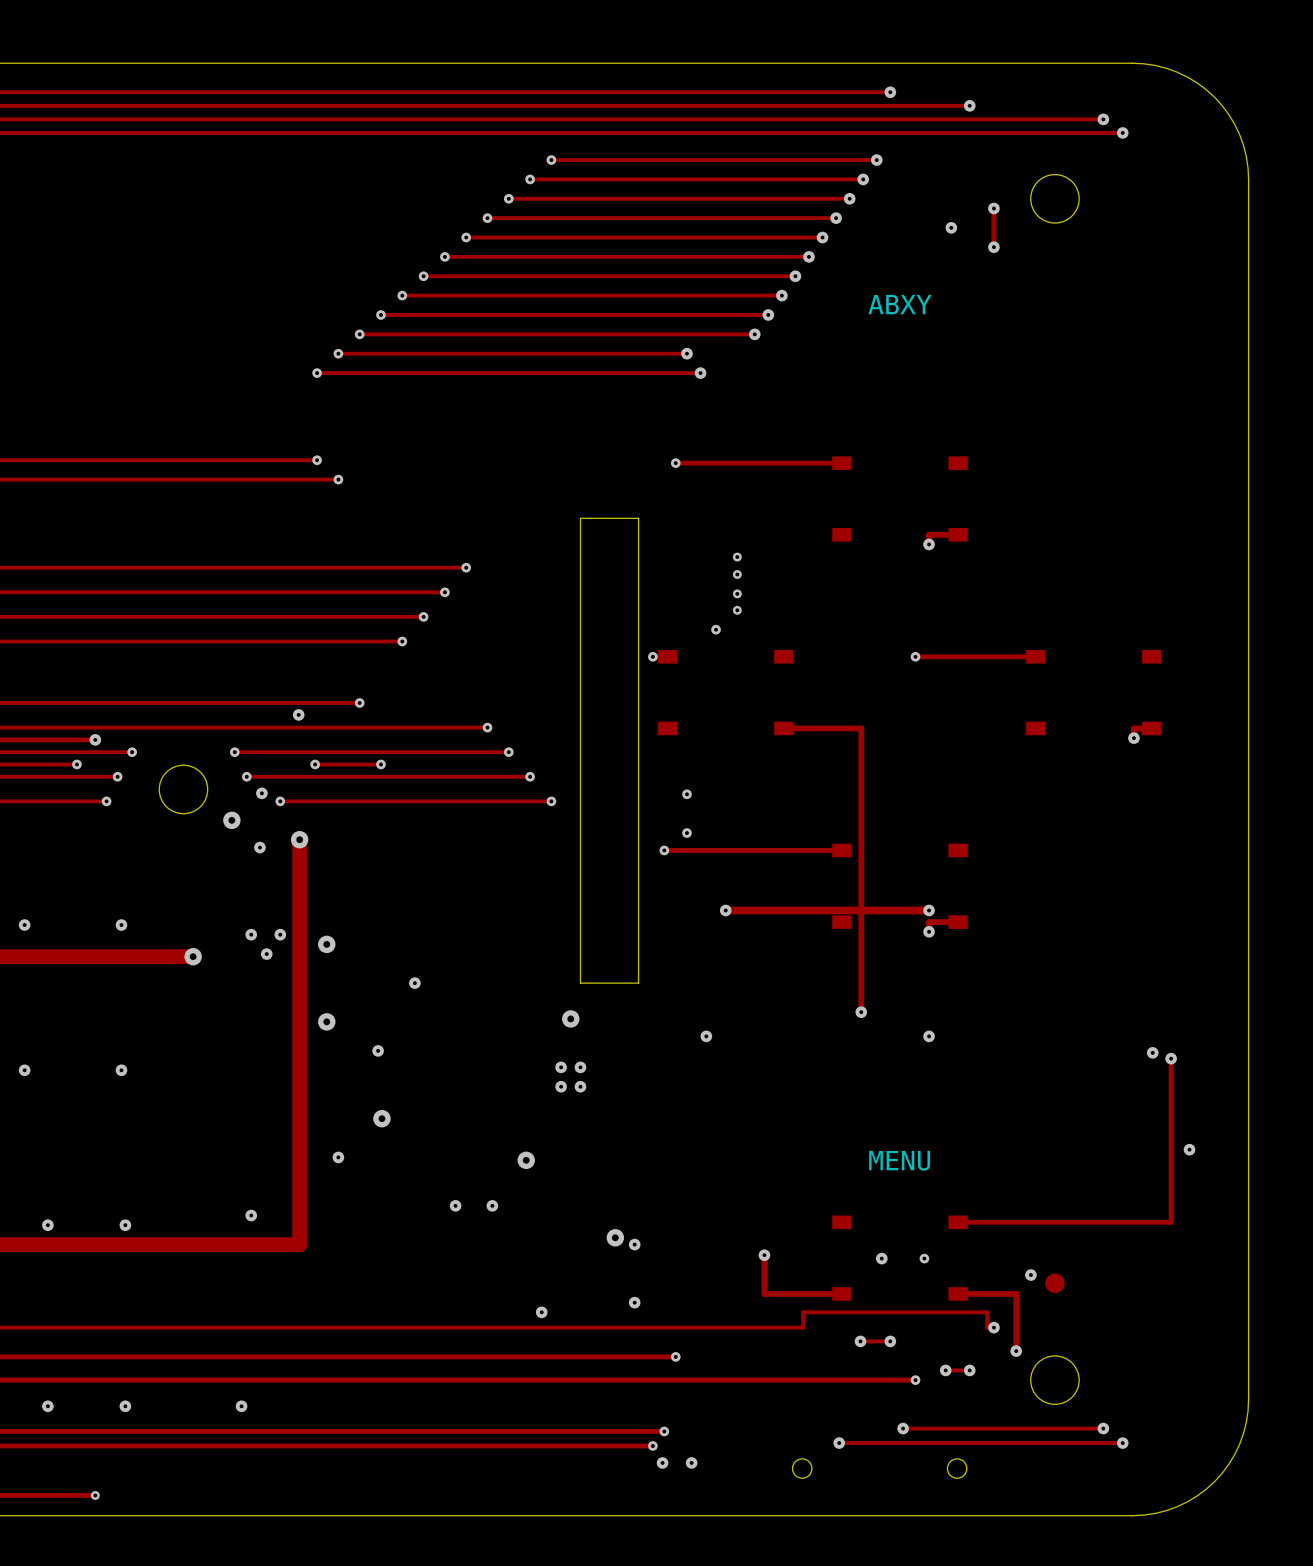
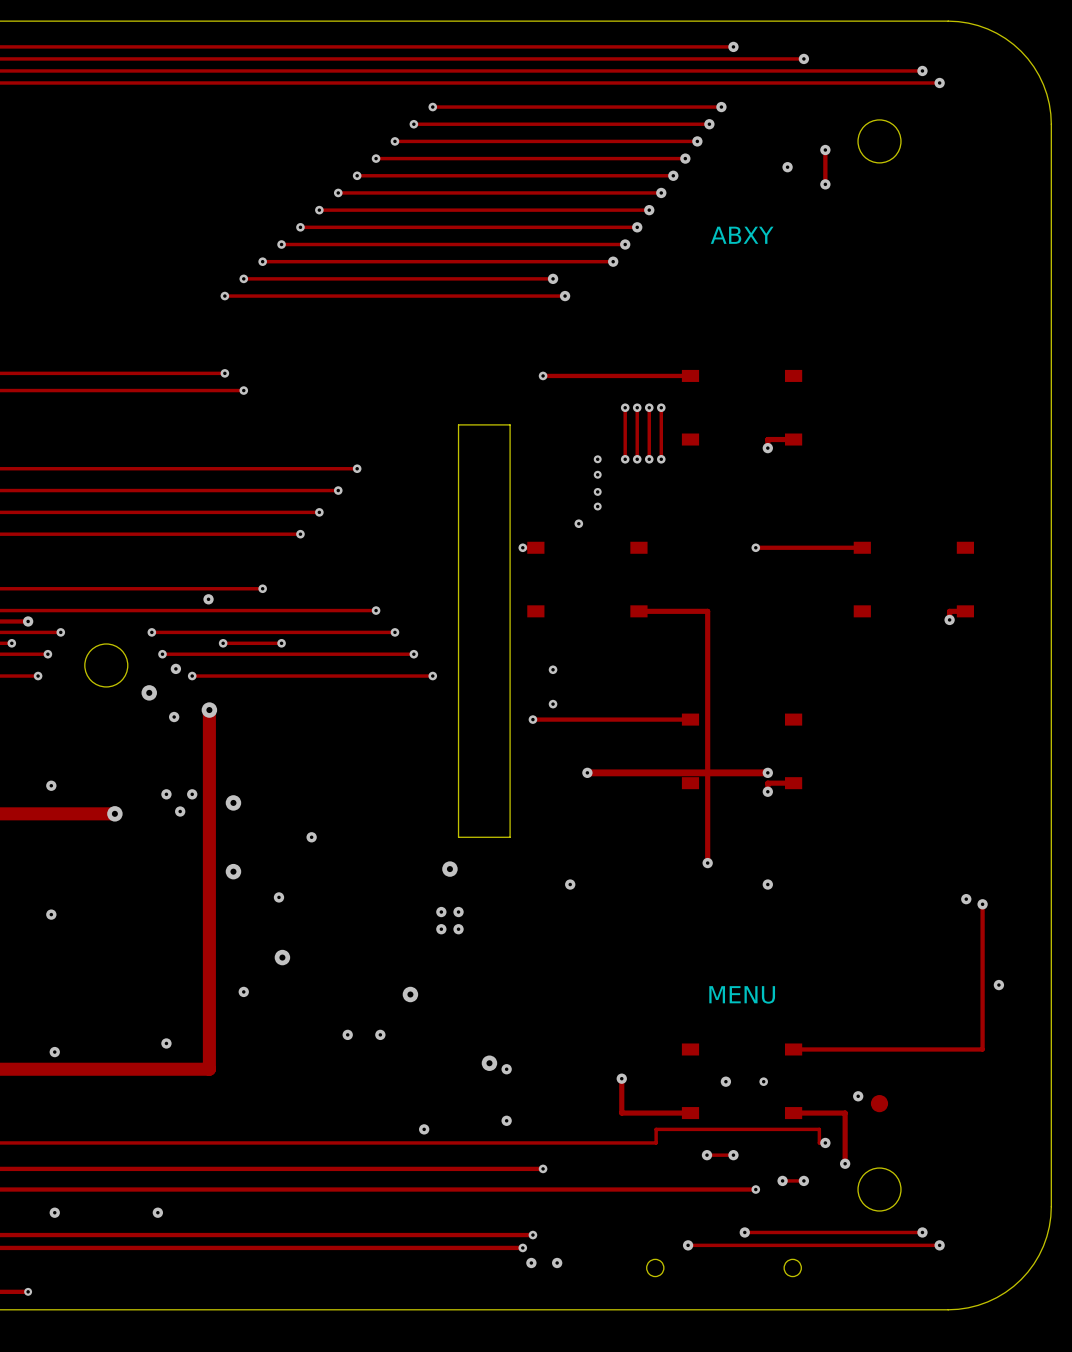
track: none -> (625, 407) (625, 459)
via: none -> (625, 407)
track: none -> (637, 407) (637, 459)
via: none -> (637, 407)
track: none -> (649, 407) (649, 459)
via: none -> (649, 407)
track: none -> (661, 407) (661, 459)
via: none -> (661, 407)
via: none -> (625, 459)
via: none -> (637, 459)
via: none -> (649, 459)
via: none -> (661, 459)

